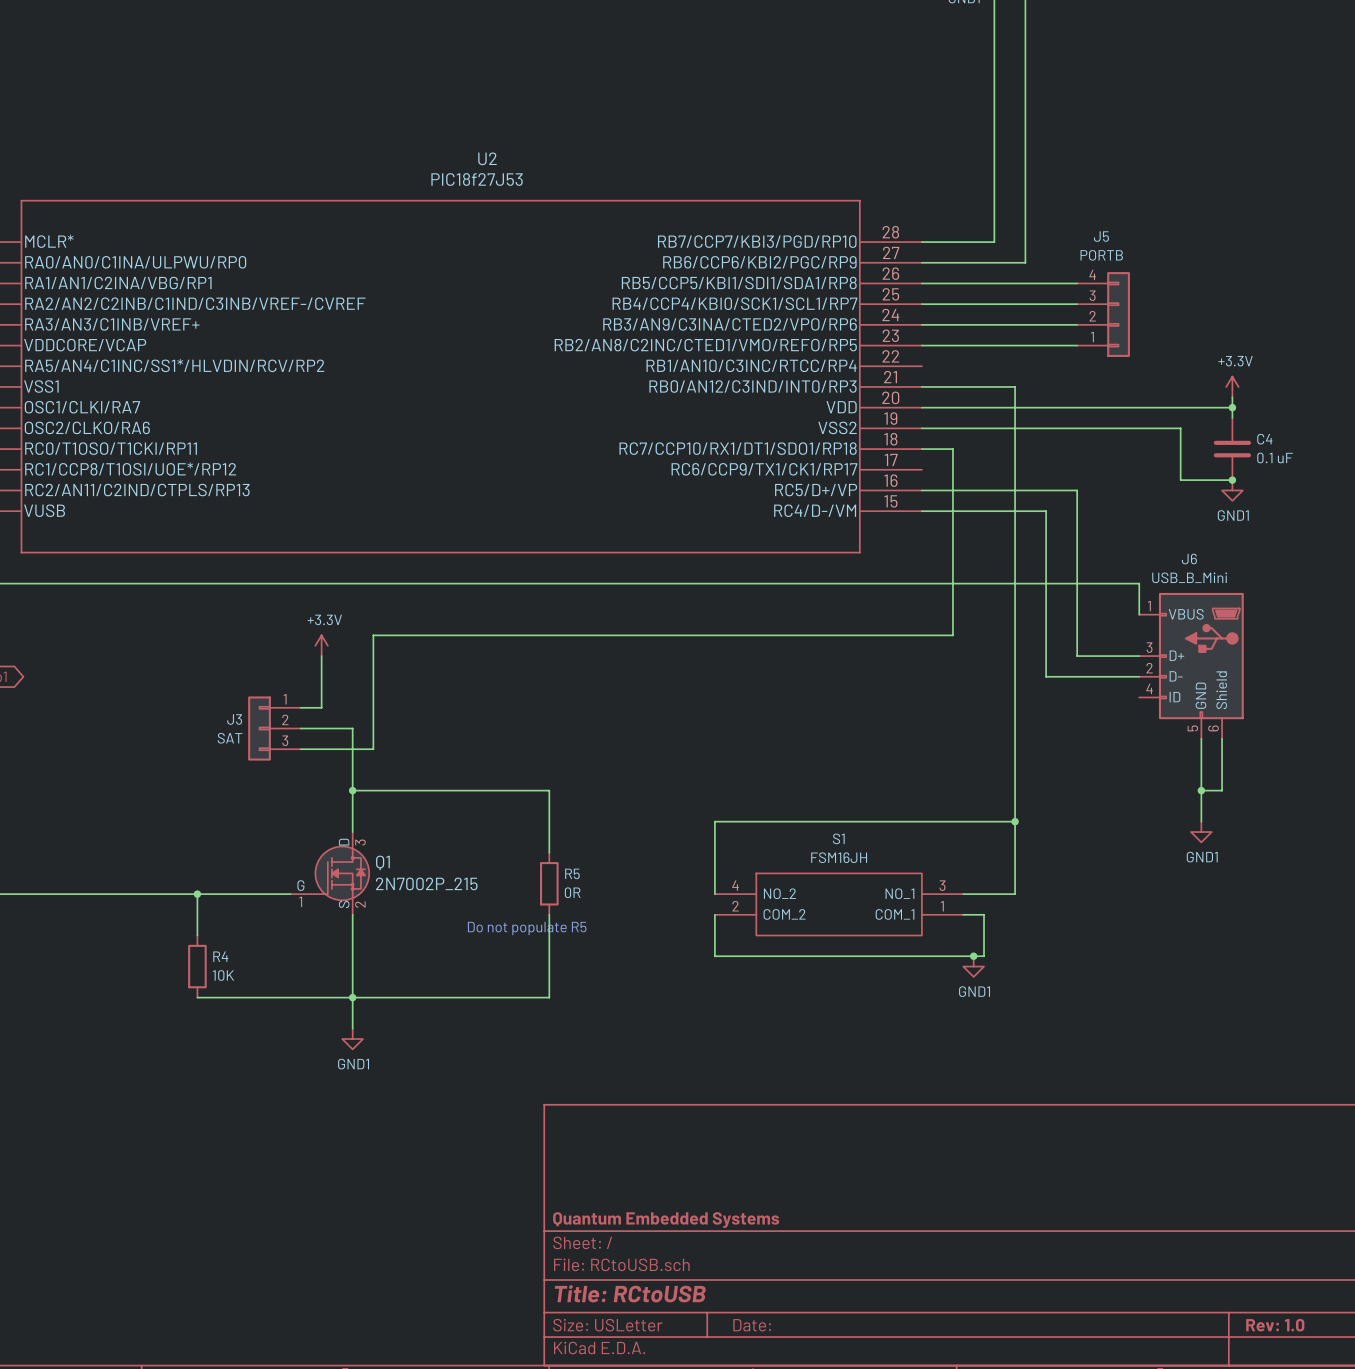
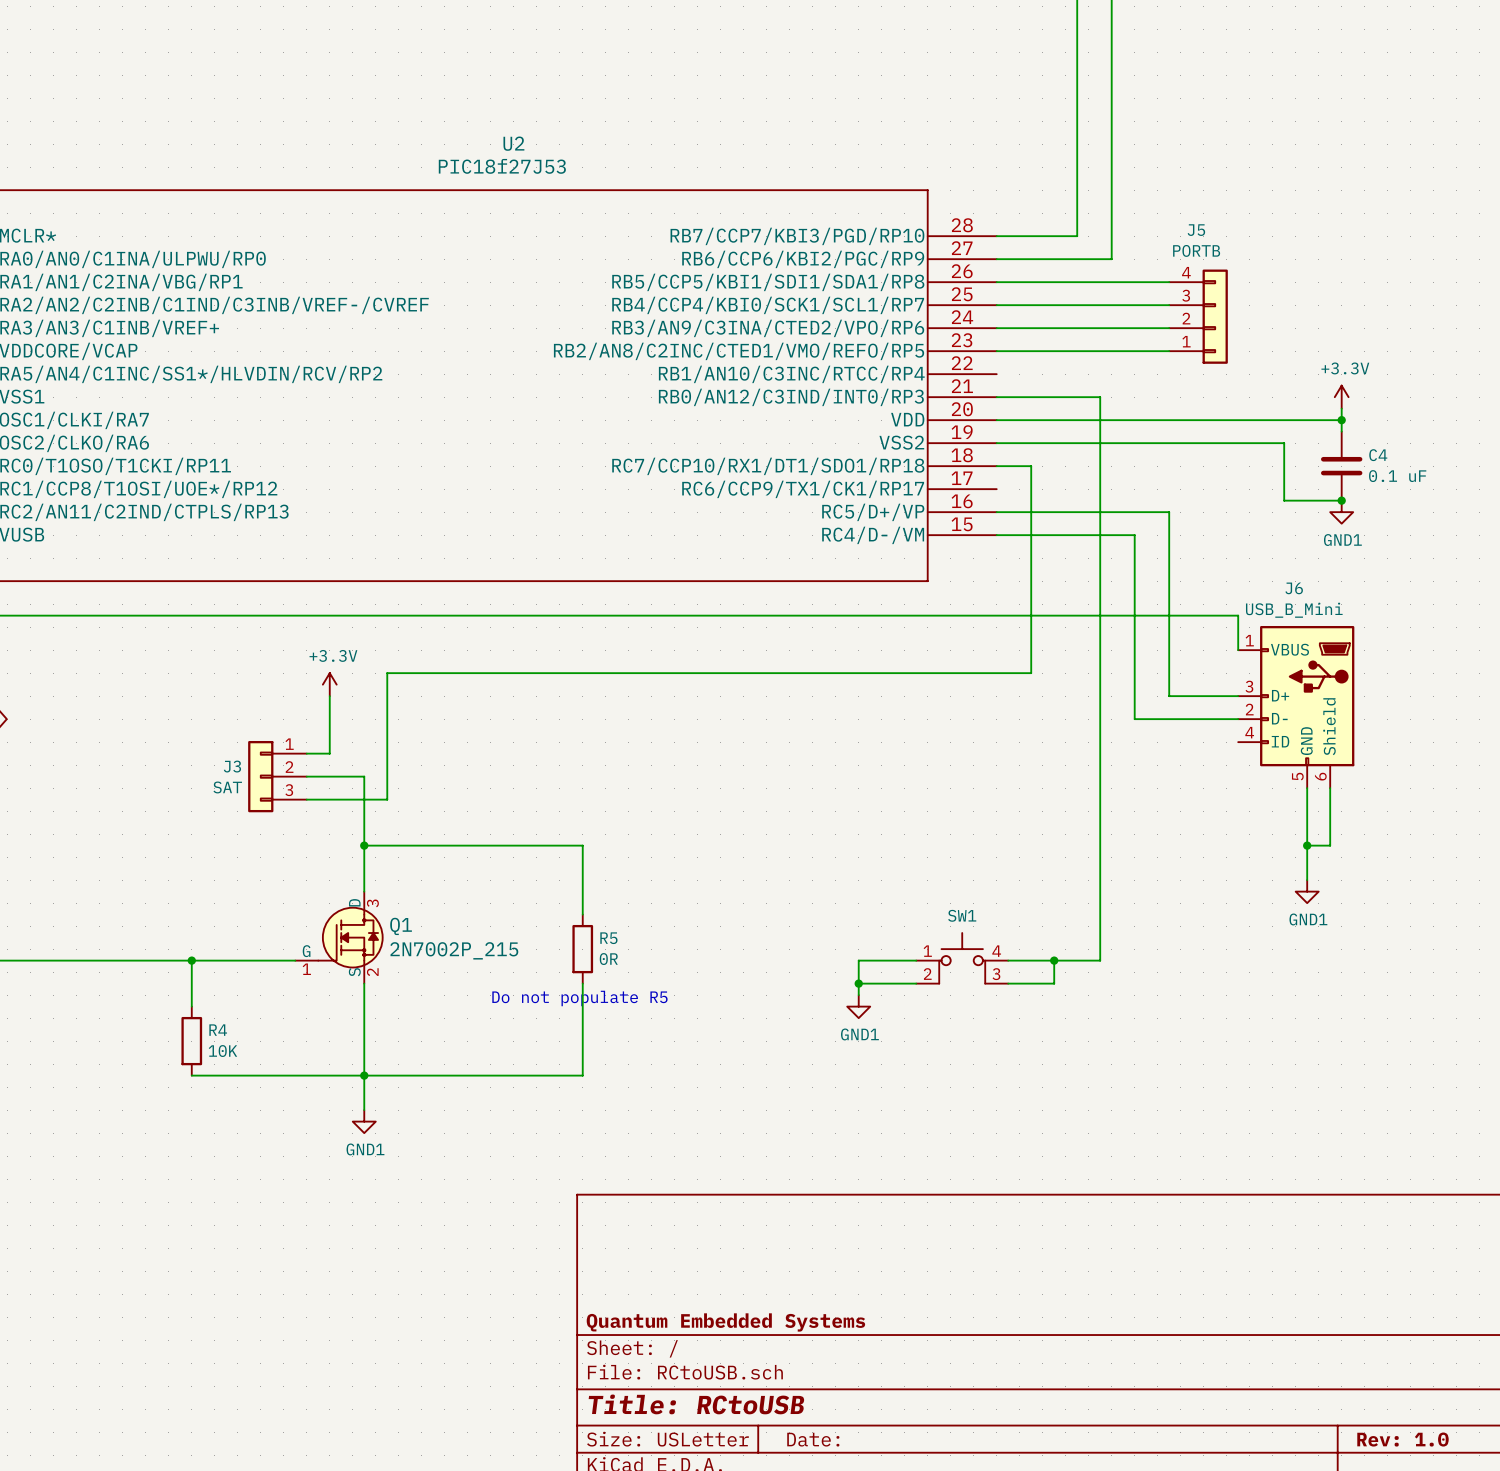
wire: (1015, 821) (714, 821) (714, 894) -> none
junction: (1015, 821) -> none
SW1: none -> (962, 958)
wire: none -> (916, 960) (858, 960) (858, 995)
junction: none -> (1054, 960)
S1: FSM16JH (839, 904) -> none
wire: (714, 914) (714, 956) (984, 956) (984, 914) (973, 914) -> (1054, 960) (1054, 983)
wire: none -> (858, 983) (916, 983)
junction: none -> (858, 983)
junction: (973, 956) -> none
power symbol position: GND1 (973, 966) -> GND1 (858, 1006)

